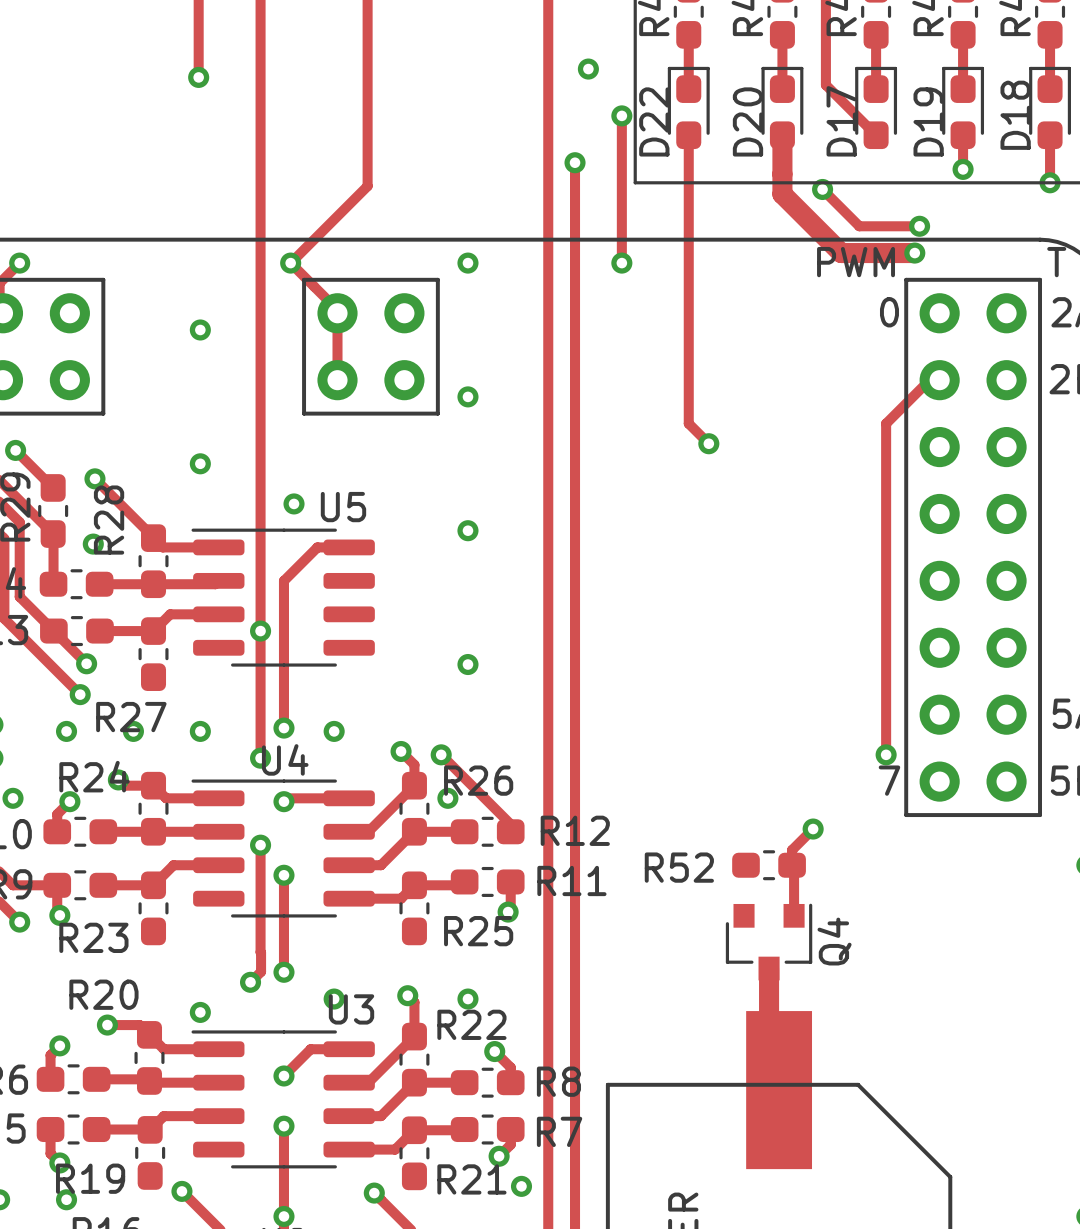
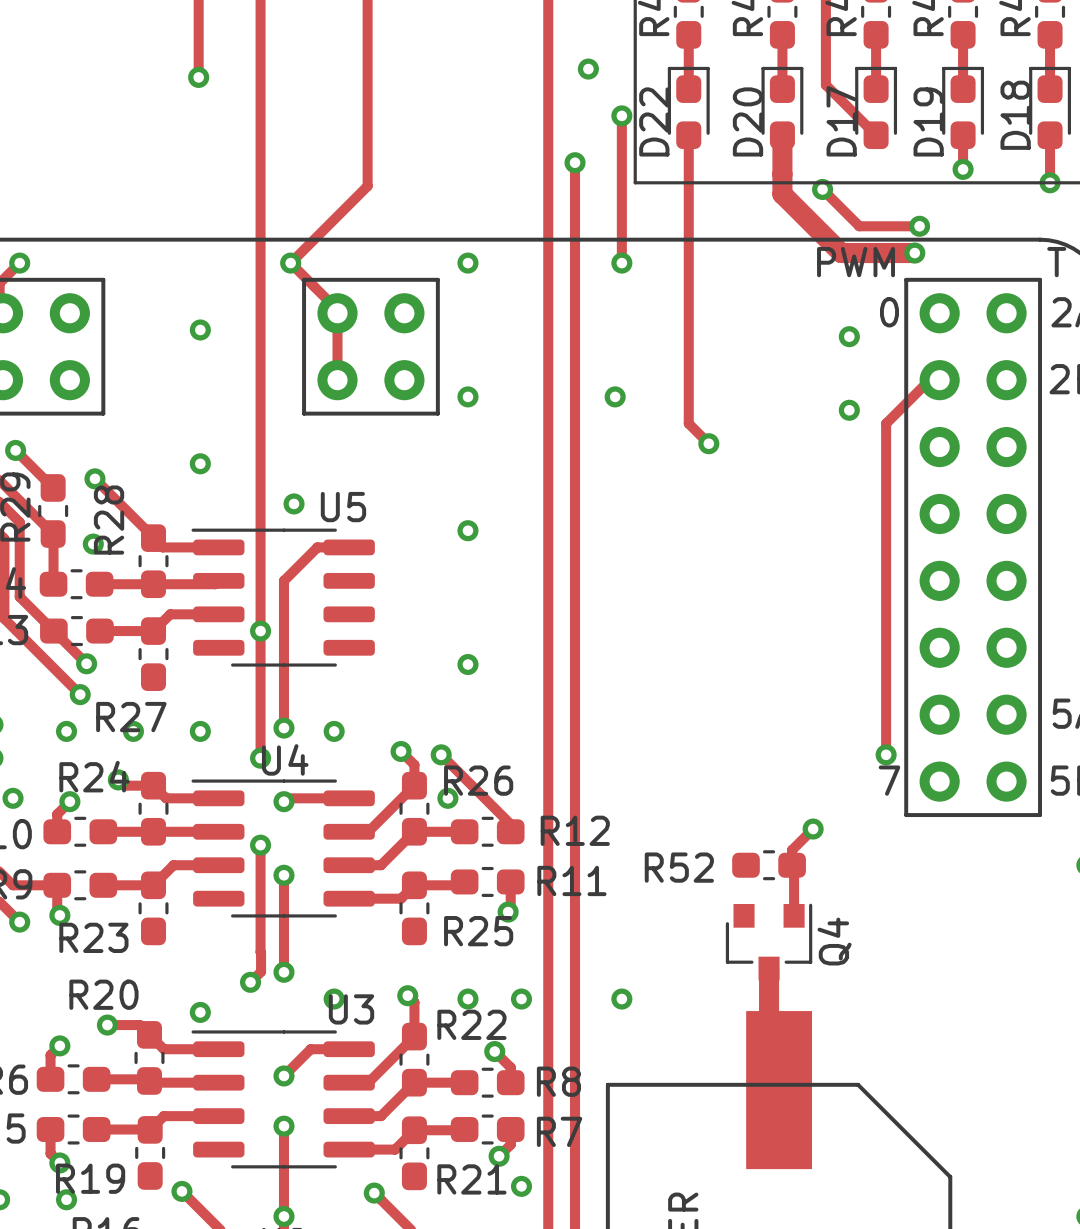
via: none -> (849, 336)
via: none -> (615, 396)
via: none -> (849, 410)
via: none -> (521, 999)
via: none -> (621, 999)

